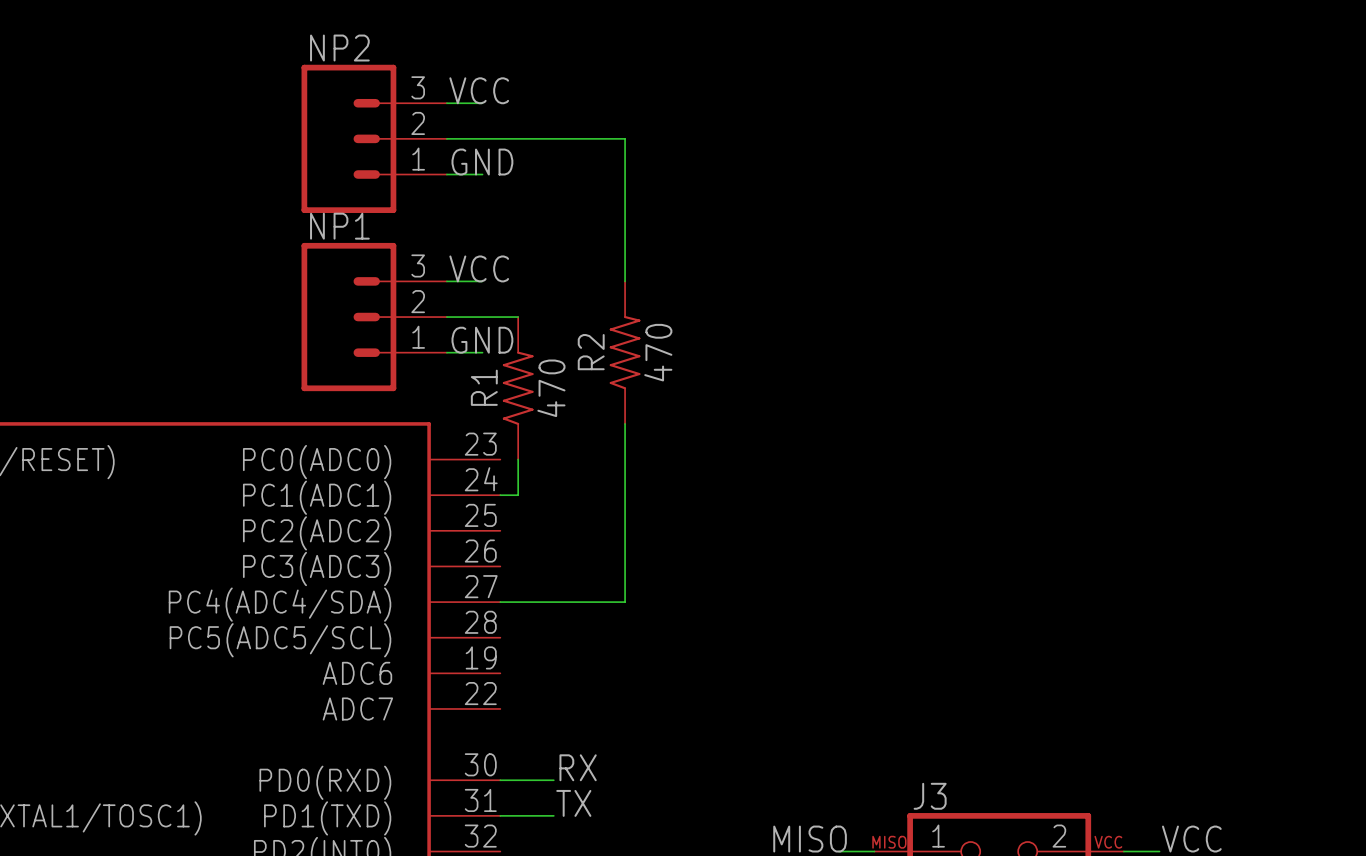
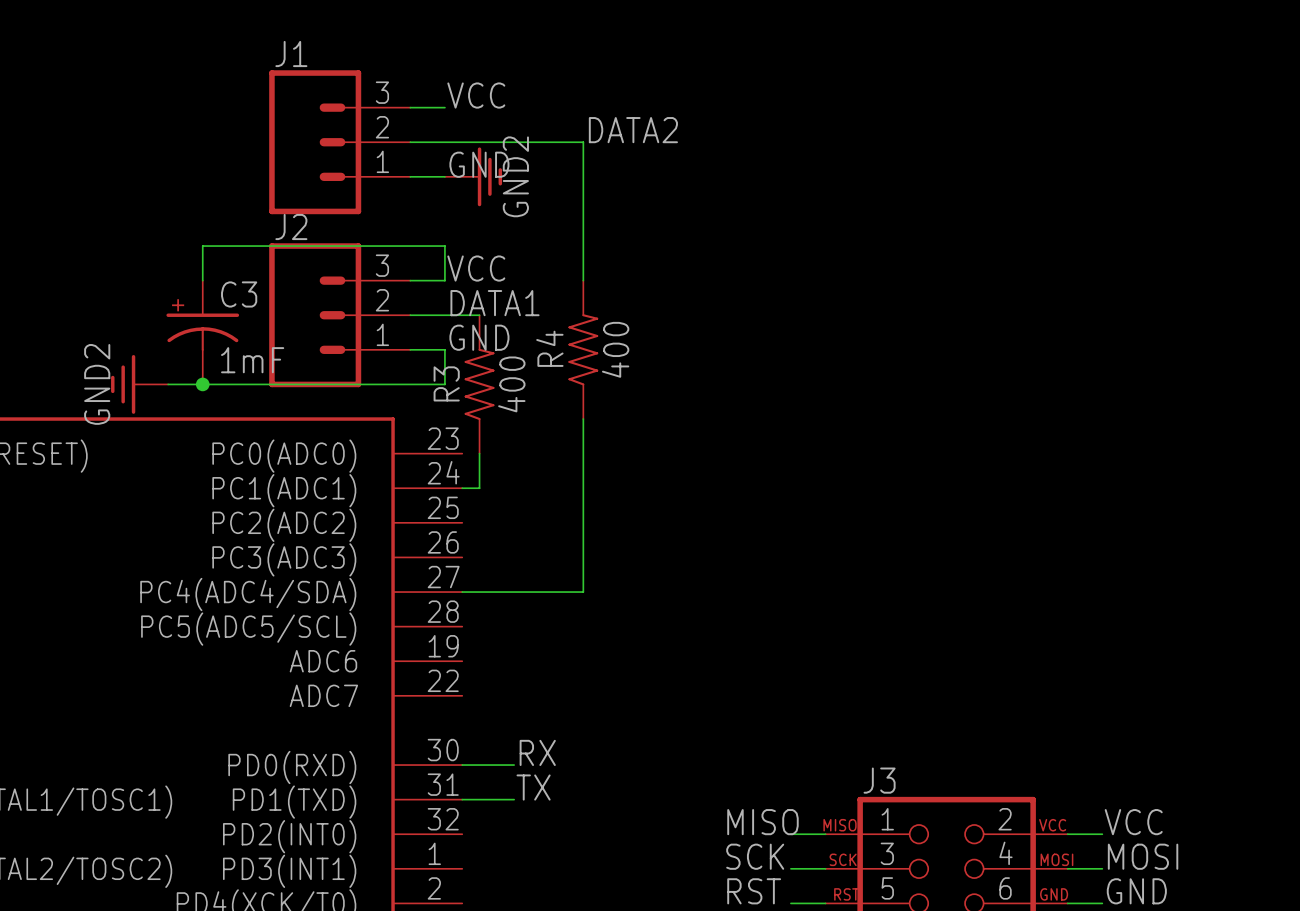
NP2 name: NP2 (339, 48) -> J1 (291, 54)
label position: VCC (479, 90) -> VCC (476, 95)
label: none -> DATA2 (633, 130)
label position: GND (482, 162) -> GND (479, 164)
power symbol: none -> GND2 (473, 176)
NP1 name: NP1 (339, 226) -> J2 (291, 227)
label position: VCC (479, 268) -> VCC (476, 268)
wire: none -> (202, 280) (202, 246) (444, 246) (444, 280)
label: none -> DATA1 (495, 303)
C3: none -> 1mF (202, 332)
label position: GND (482, 340) -> GND (479, 337)
wire: none -> (444, 349) (444, 384) (168, 384)
R2 name: R2 (591, 352) -> R4 (549, 348)
R2 value: 470 (658, 352) -> 400 (615, 349)
R1 name: R1 (484, 387) -> R3 (446, 383)
power symbol: none -> GND2 (139, 384)
junction: none -> (202, 384)
R1 value: 470 (551, 388) -> 400 (511, 384)

